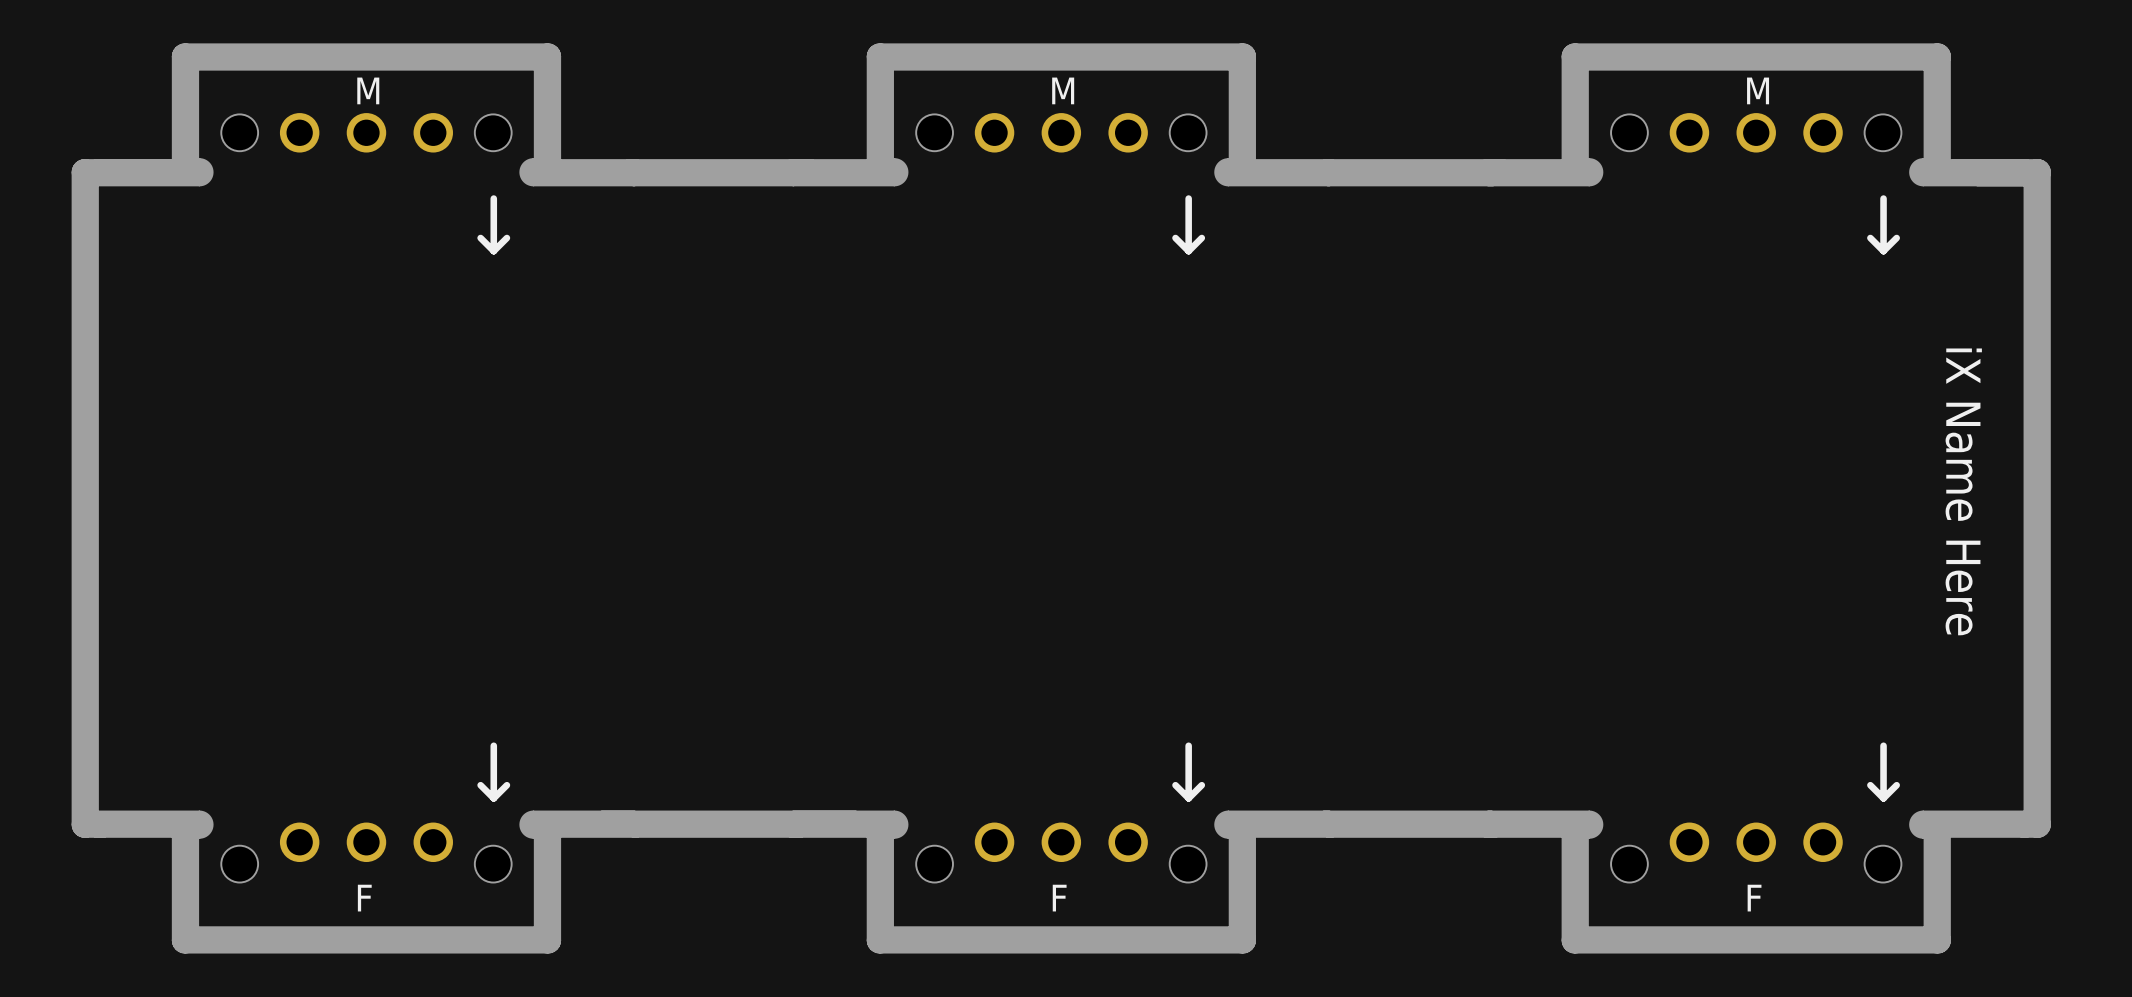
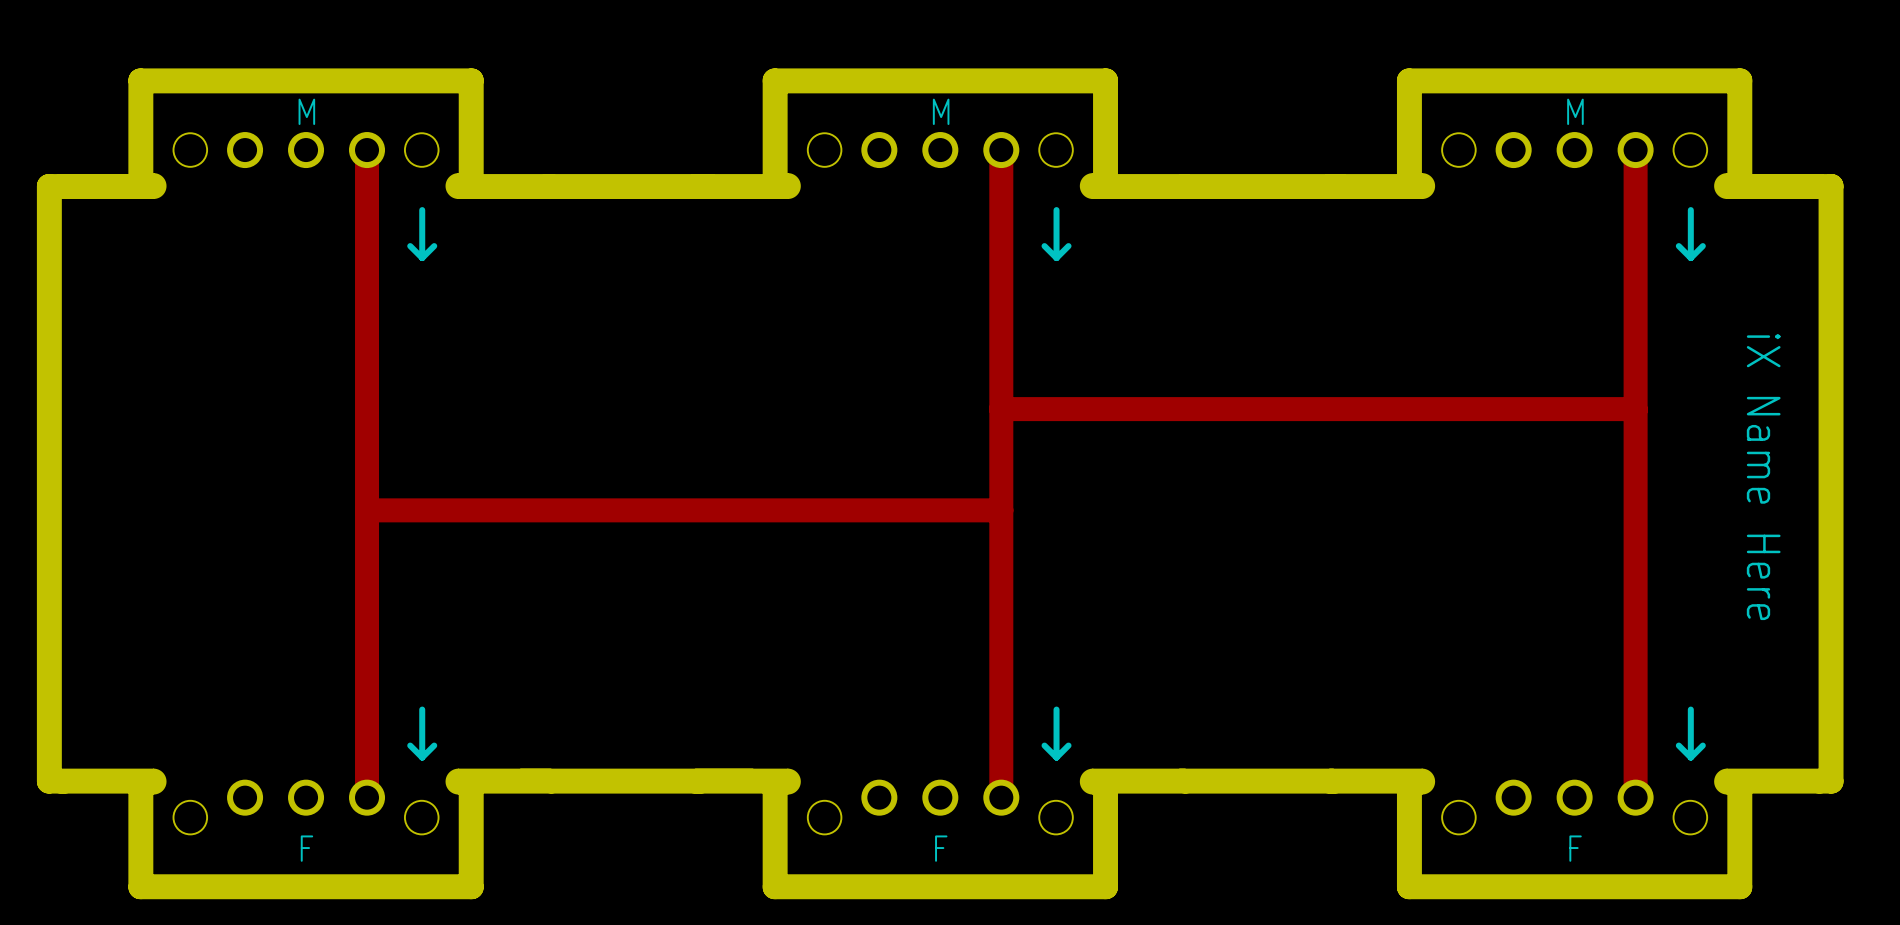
track: none -> (367, 150) (367, 797)
track: none -> (1001, 150) (1001, 797)
track: none -> (1635, 150) (1635, 797)
track: none -> (1001, 409) (1635, 409)
track: none -> (367, 510) (1001, 510)

